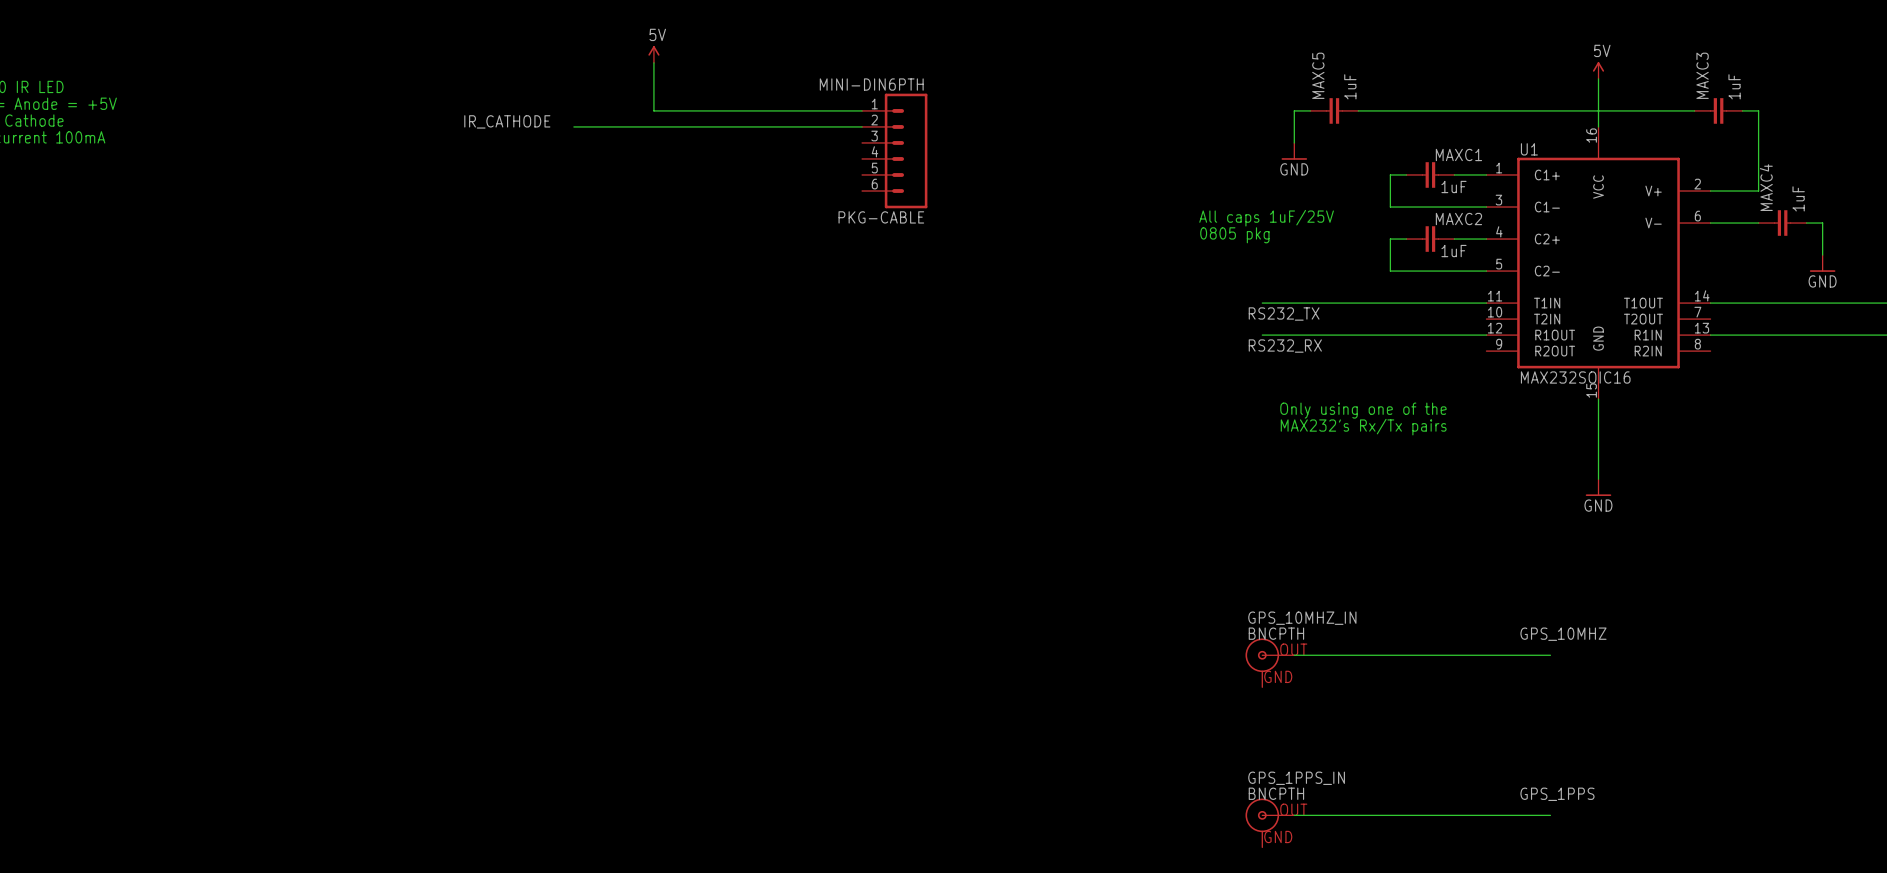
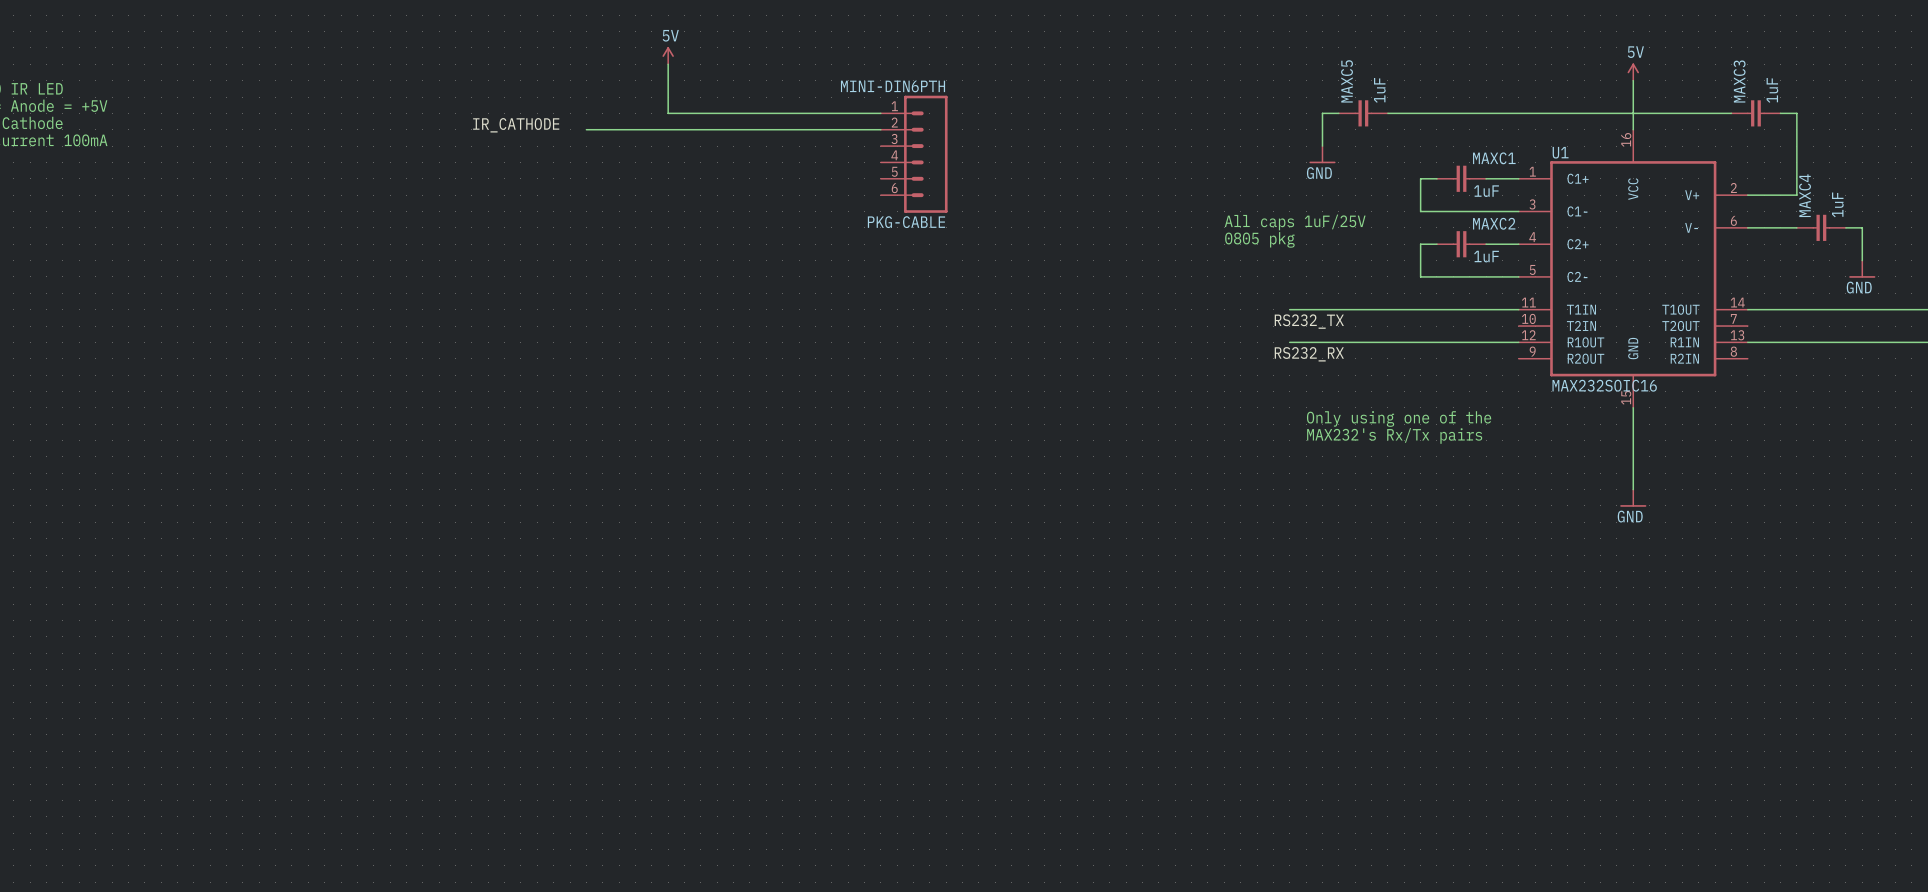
label: GPS_10MHZ (1563, 634) -> none
wire: (1294, 655) (1550, 655) -> none
GPS_10MHZ_IN: BNCPTH (1269, 662) -> none
label: GPS_1PPS (1557, 794) -> none
wire: (1294, 815) (1550, 815) -> none
GPS_1PPS_IN: BNCPTH (1269, 822) -> none

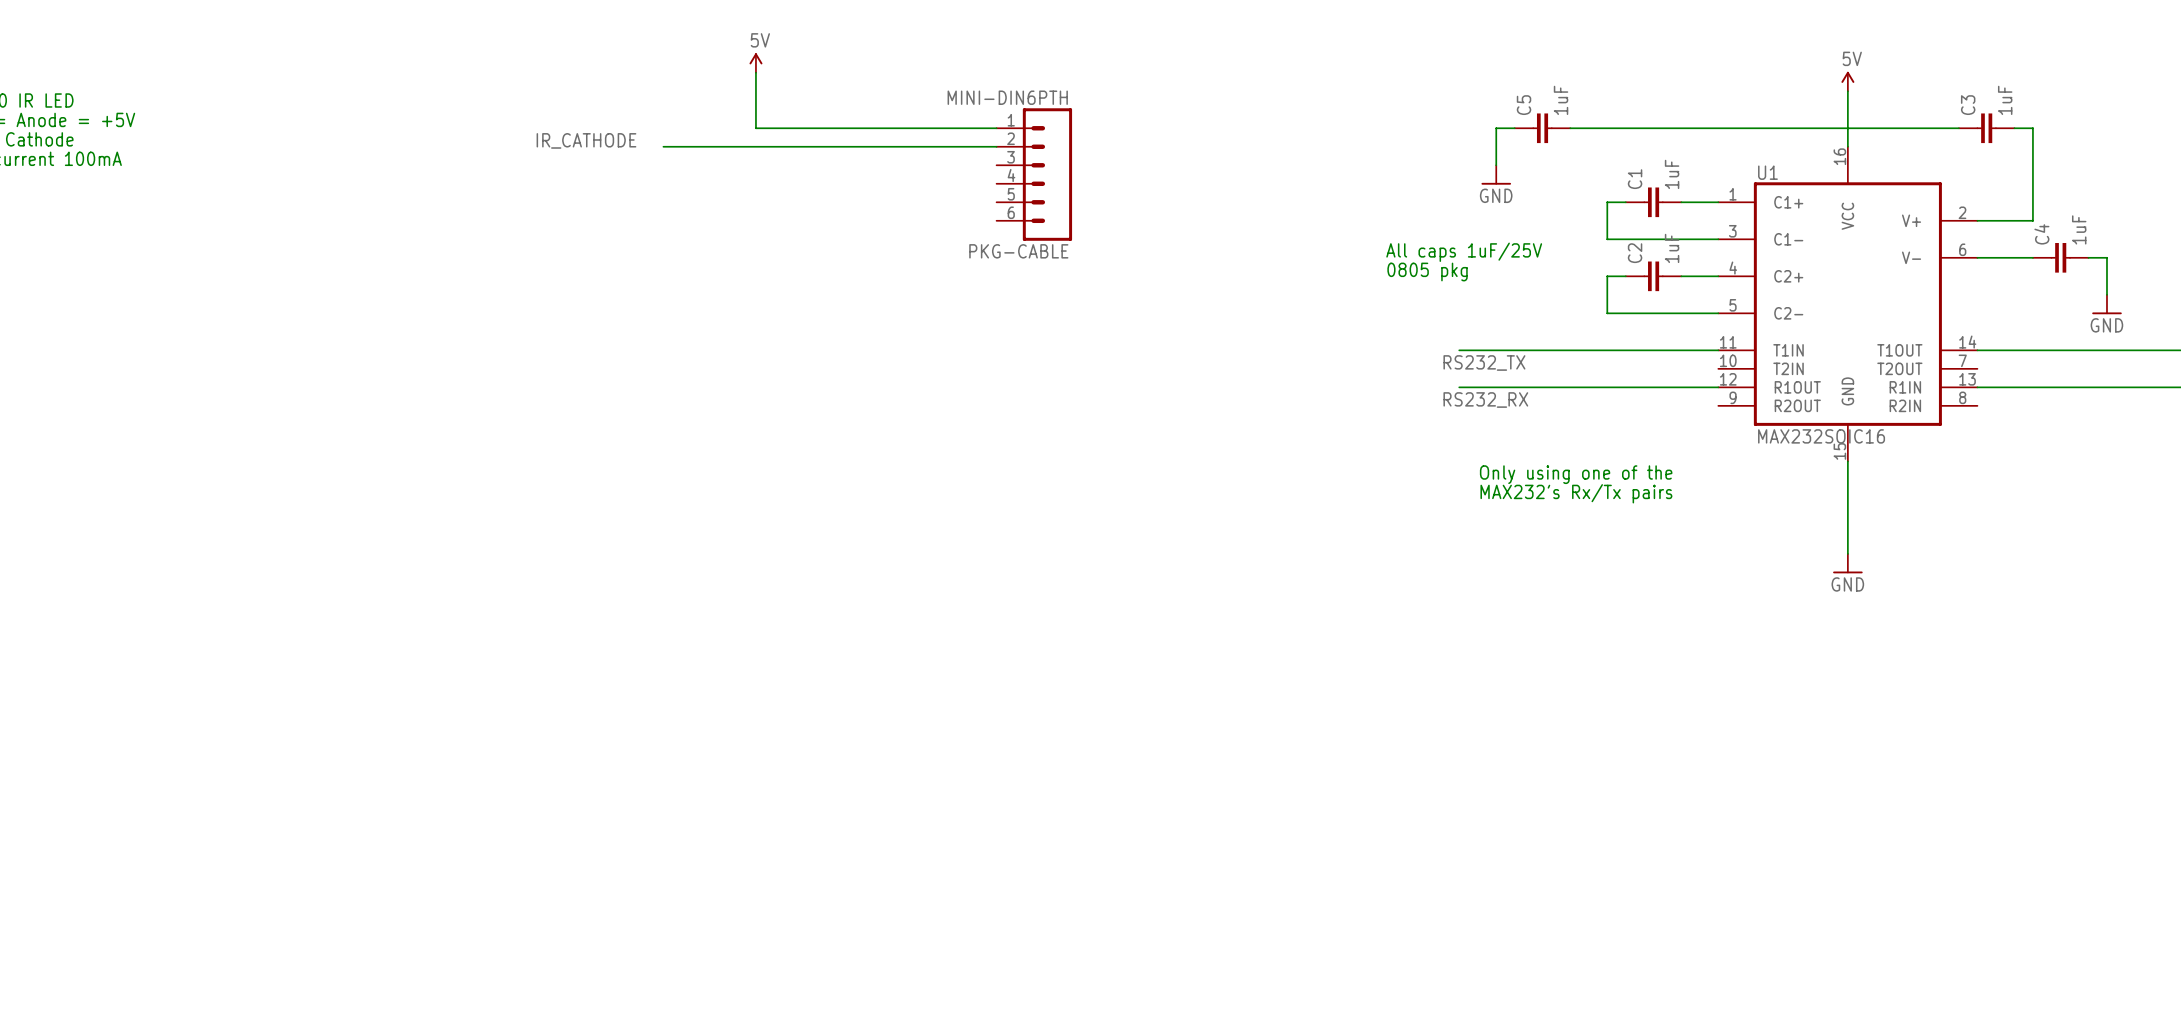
MAXC5 name: MAXC5 (1347, 81) -> C5 (1524, 105)
MAXC3 name: MAXC3 (1739, 81) -> C3 (1968, 105)
MAXC1 name: MAXC1 (1494, 158) -> C1 (1635, 179)
MAXC1 value rotation: 0° (1486, 191) -> 90° counterclockwise (1672, 174)
MAXC1 value position: 1uF (1486, 191) -> 1uF (1672, 174)
MAXC4 name: MAXC4 (1805, 195) -> C4 (2041, 234)
MAXC2 name: MAXC2 (1494, 223) -> C2 (1635, 253)
MAXC2 value rotation: 0° (1486, 256) -> 90° counterclockwise (1672, 248)
MAXC2 value position: 1uF (1486, 256) -> 1uF (1672, 248)

